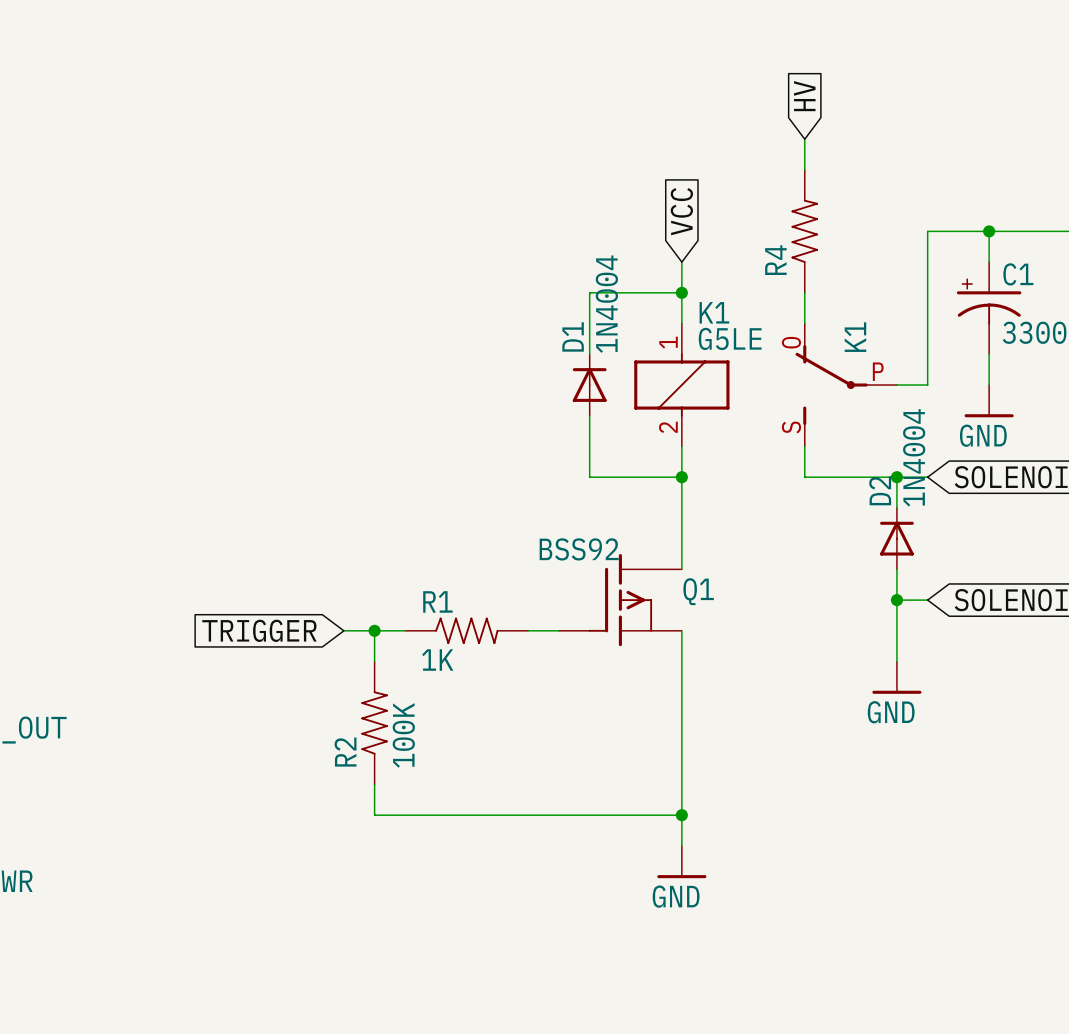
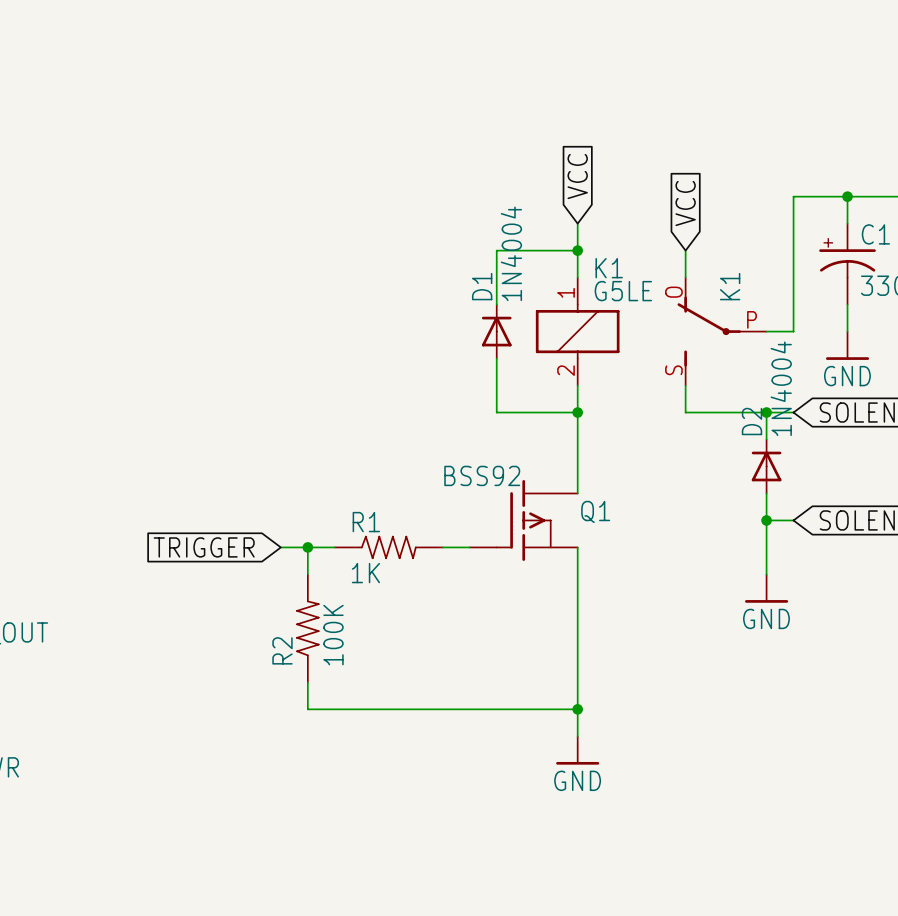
global label: HV (804, 96) -> none
wire: (804, 139) (804, 169) -> none
R4: (804, 231) -> none
global label: none -> VCC (685, 203)

